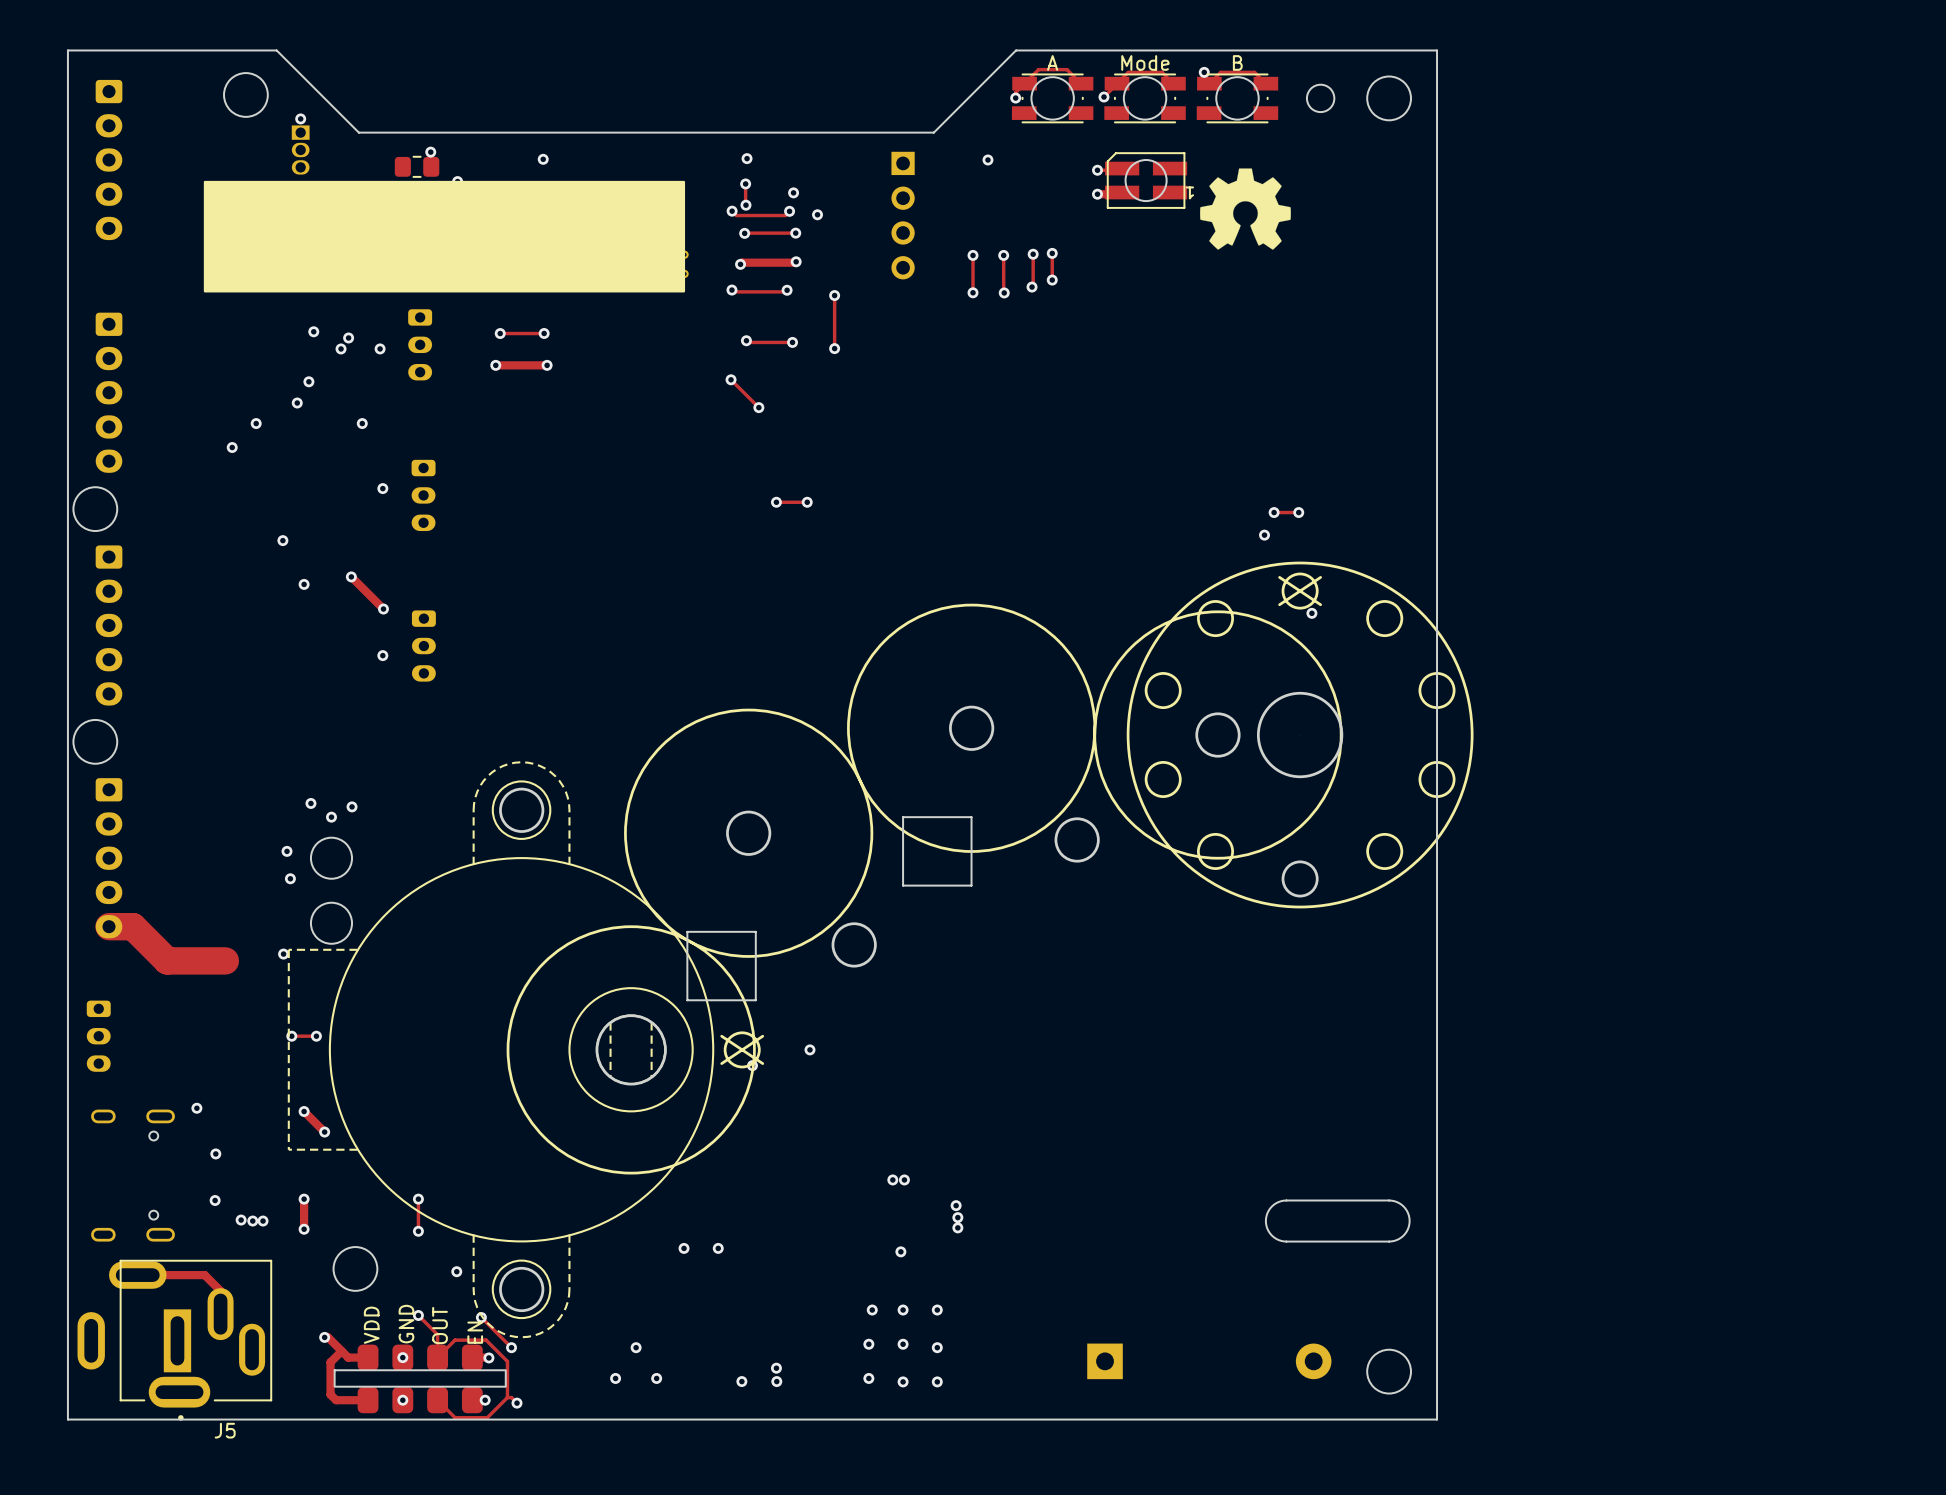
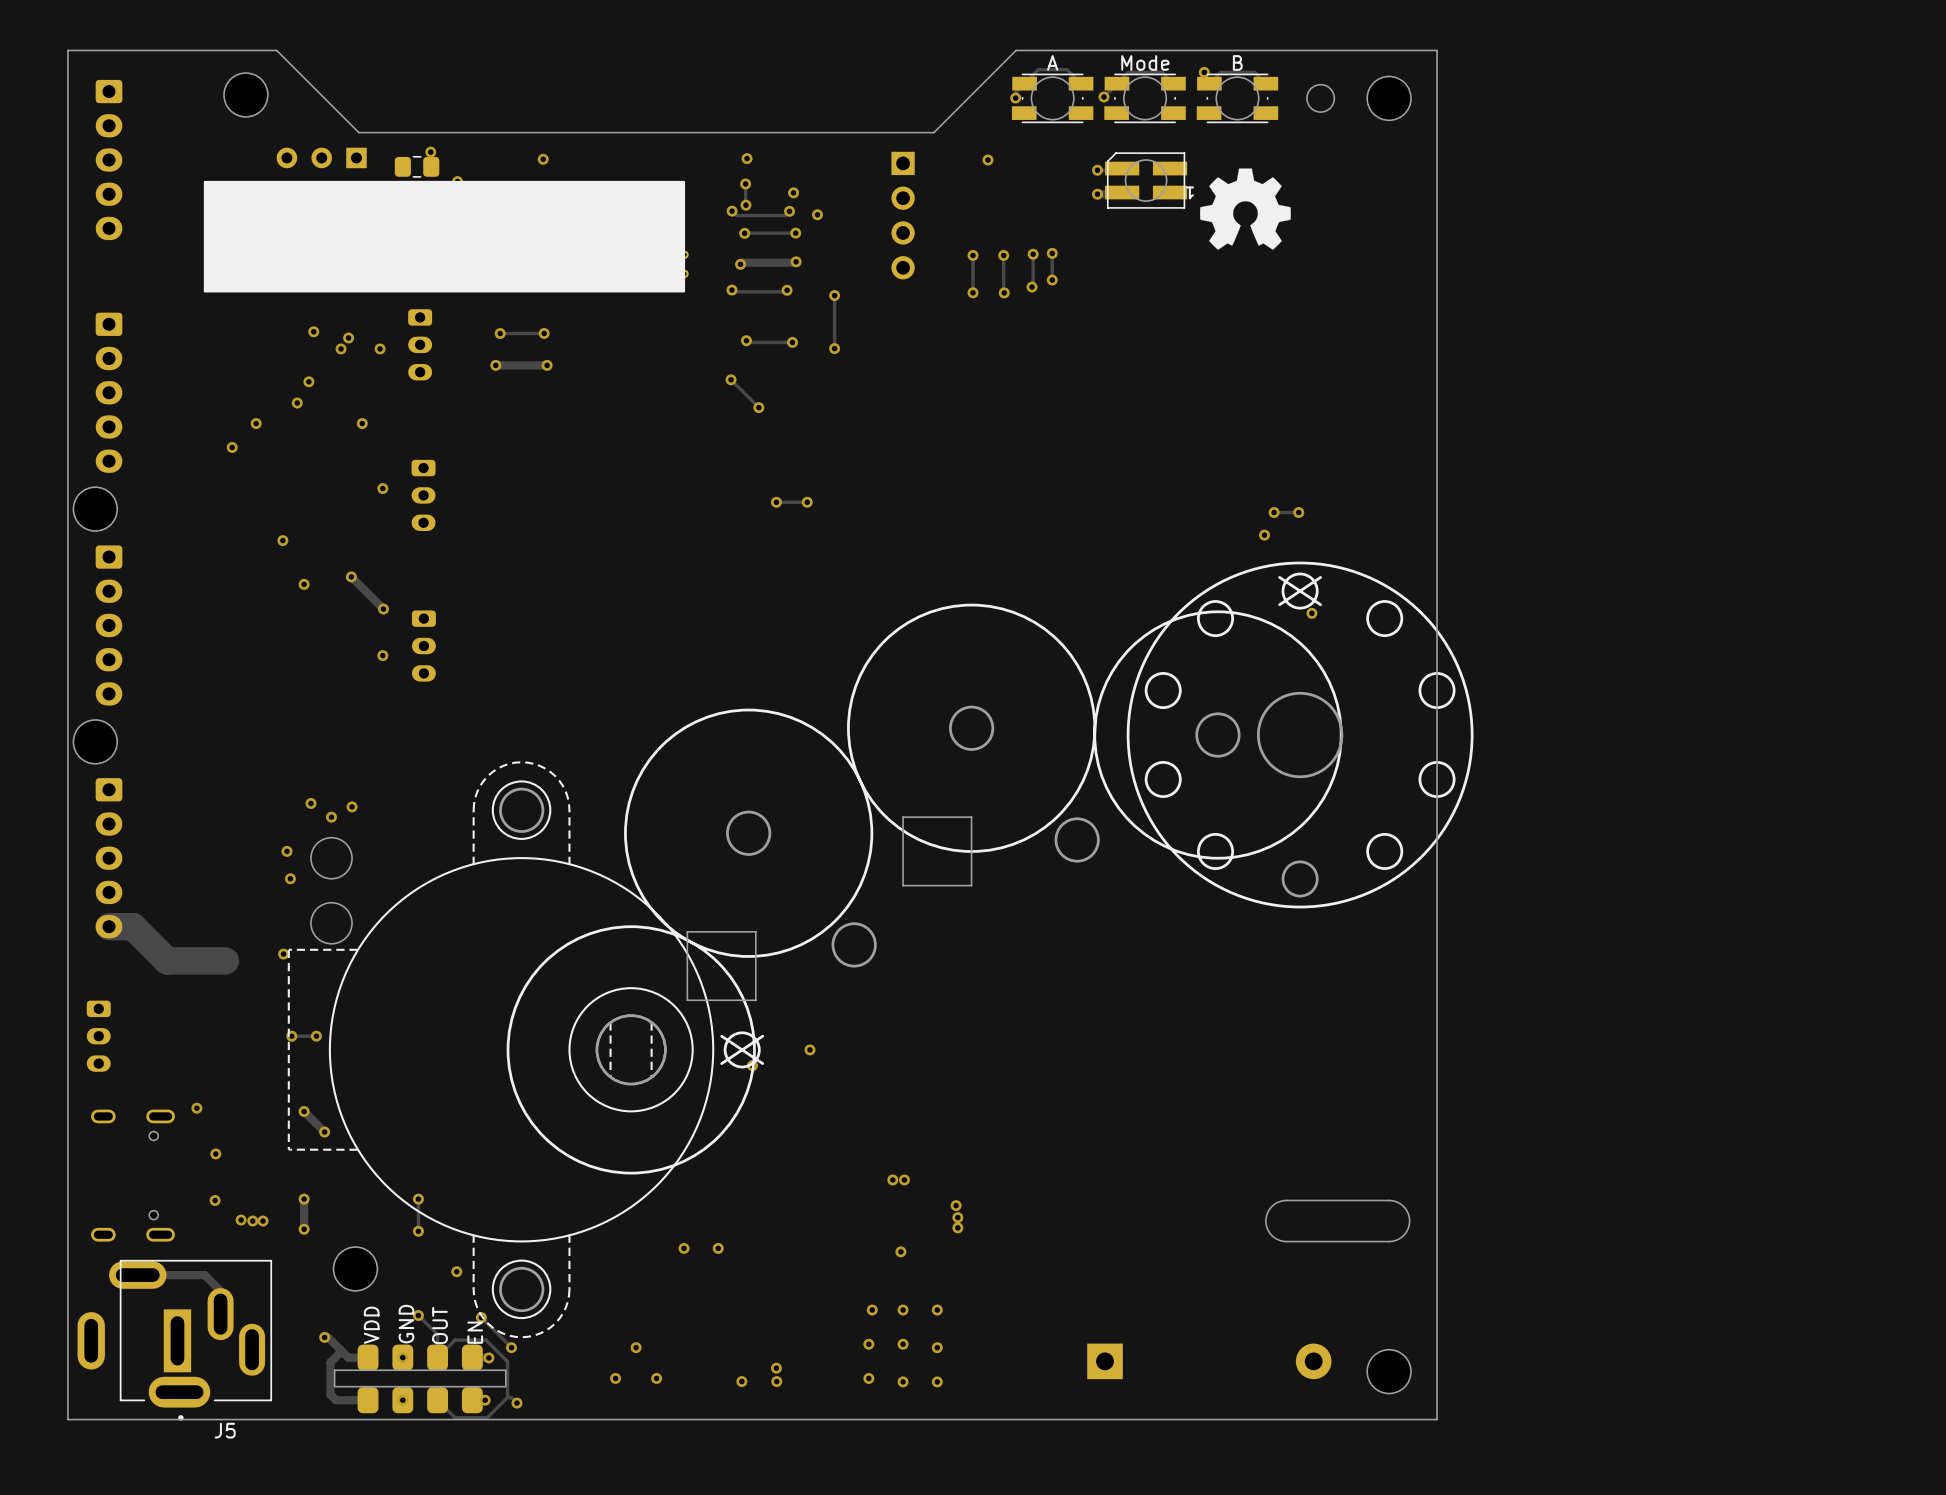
via: (300, 118) -> none
part: (300, 150) -> none
part: none -> (321, 157)

